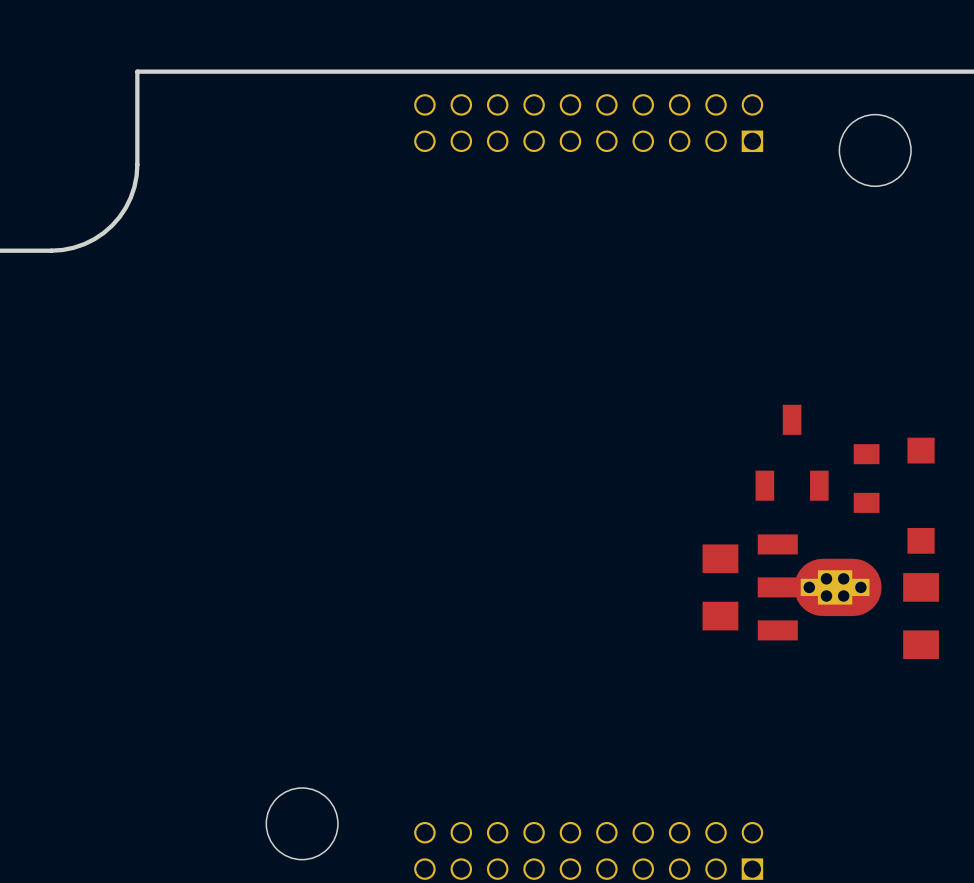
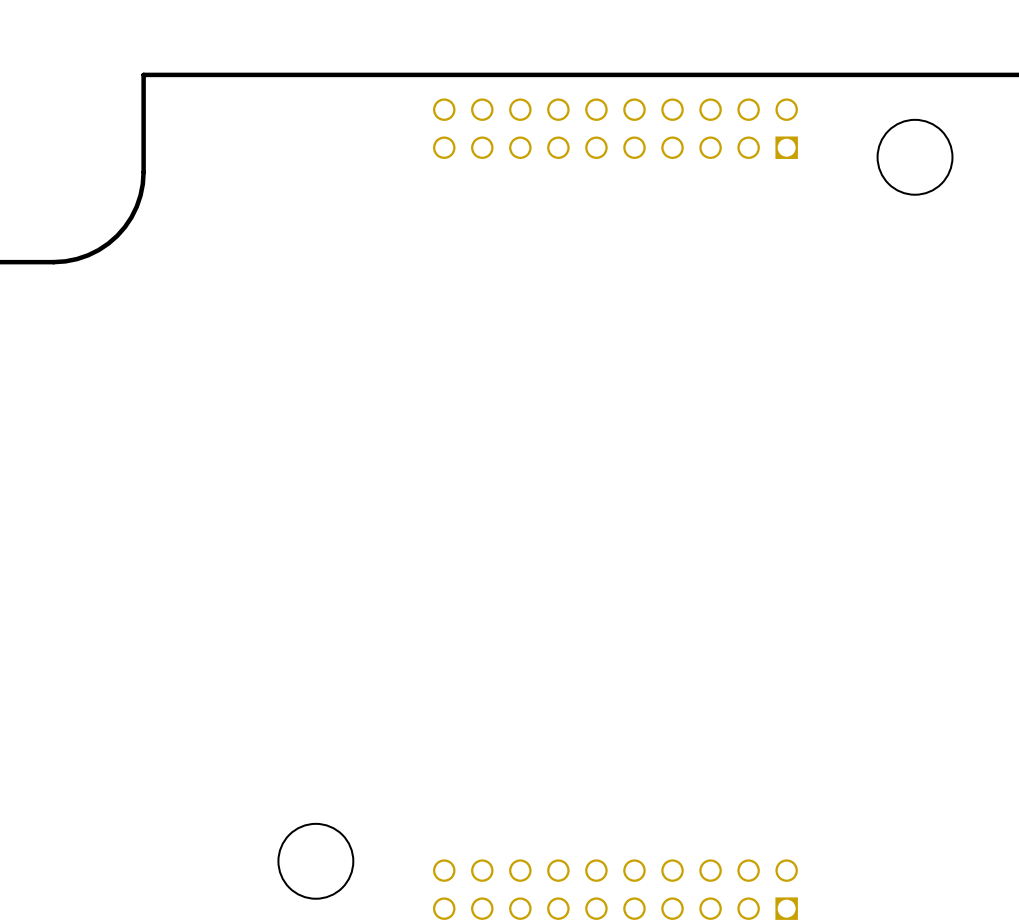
part: (792, 452) -> none
part: (866, 478) -> none
part: (921, 495) -> none
part: (720, 587) -> none
part: (819, 587) -> none
part: (921, 616) -> none

